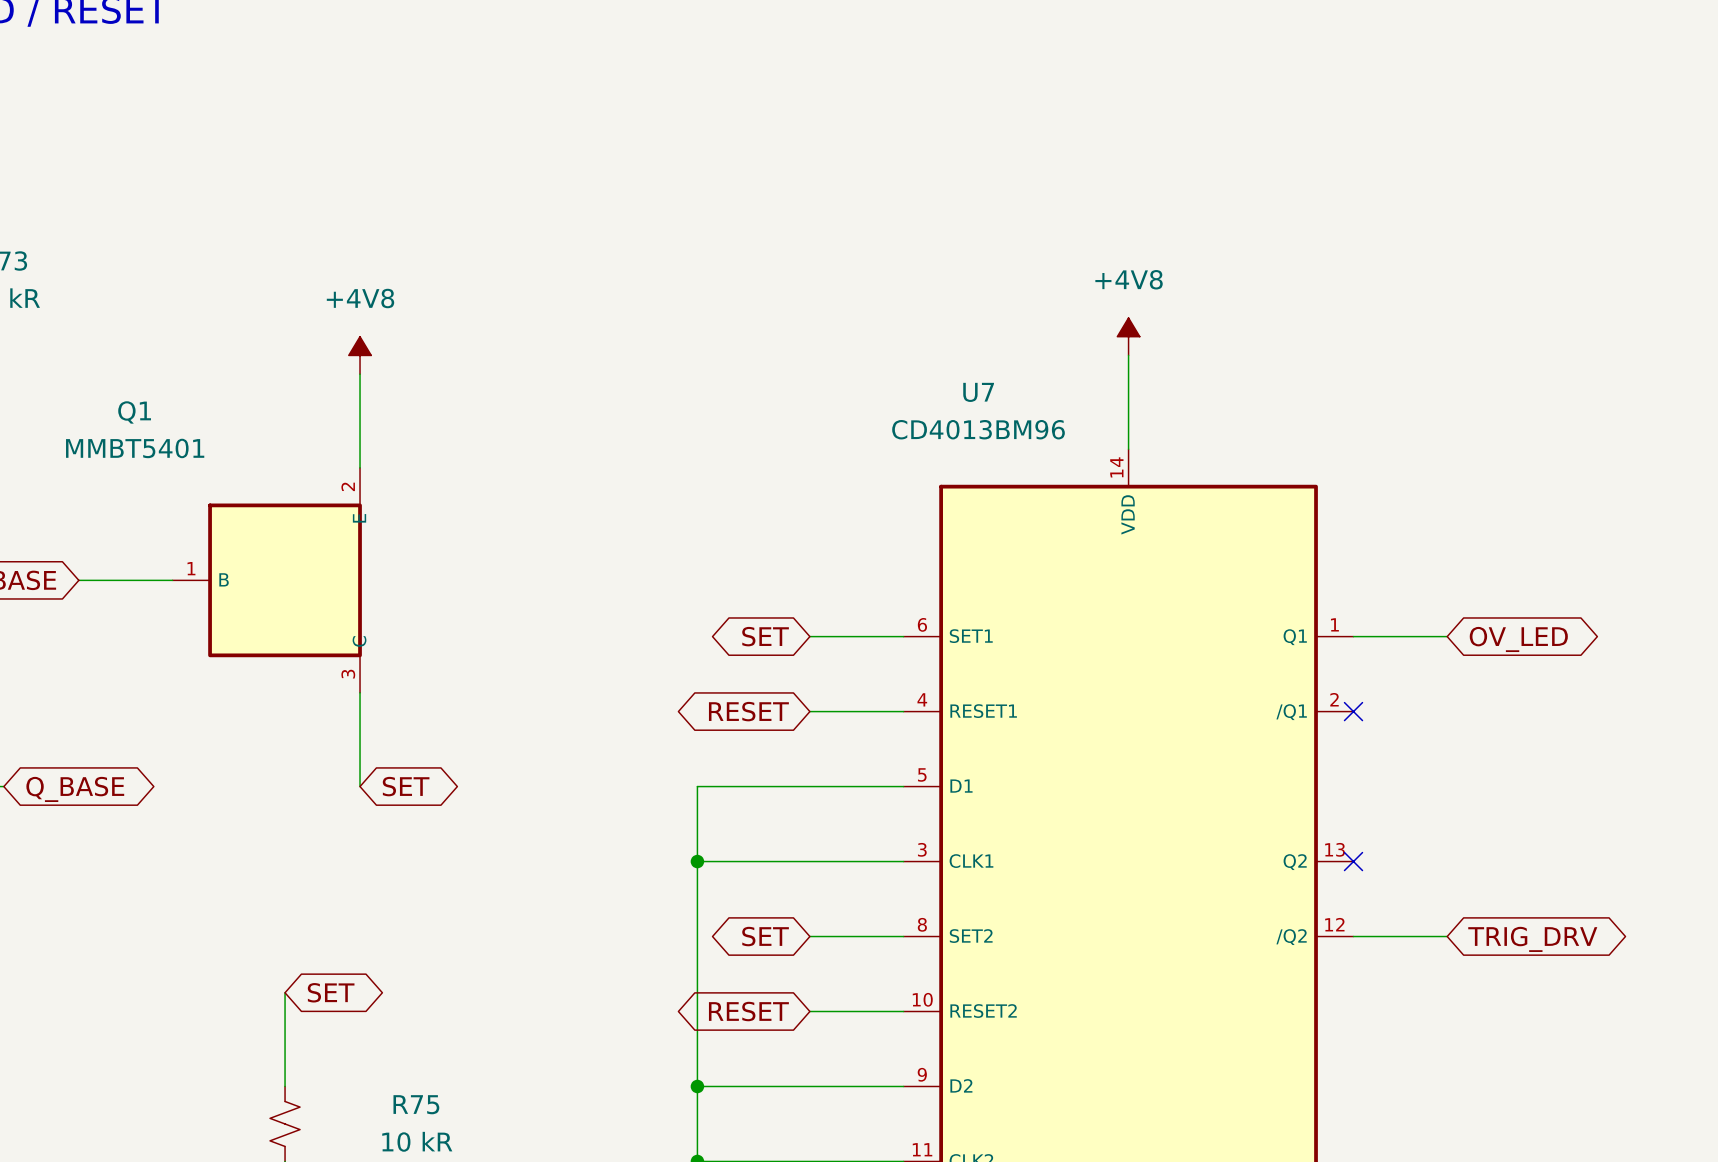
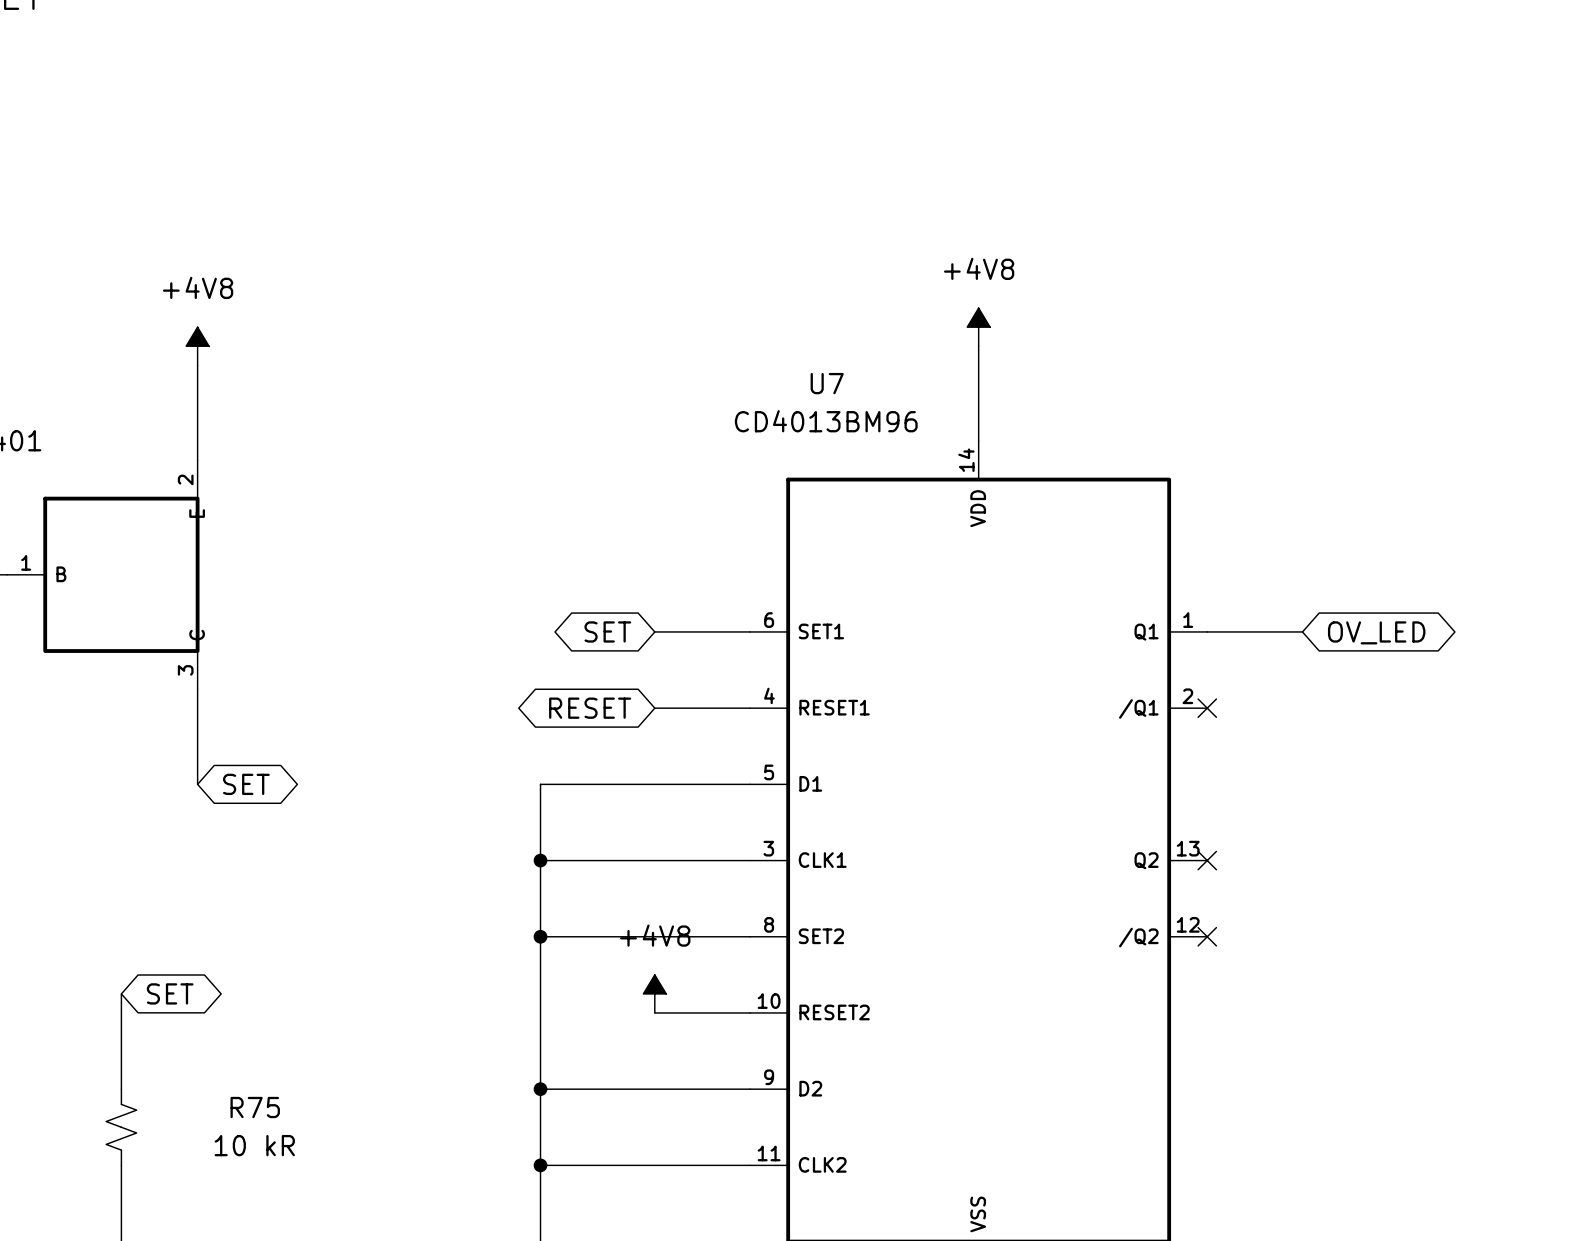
wire: none -> (540, 936) (654, 936)
junction: none -> (540, 936)
global label: SET (765, 936) -> none
wire: (1353, 936) (1447, 936) -> none
no-connect mark: none -> (1207, 936)
global label: TRIG_DRV (1532, 939) -> none
power symbol: none -> +4V8 (654, 993)
global label: RESET (748, 1011) -> none

